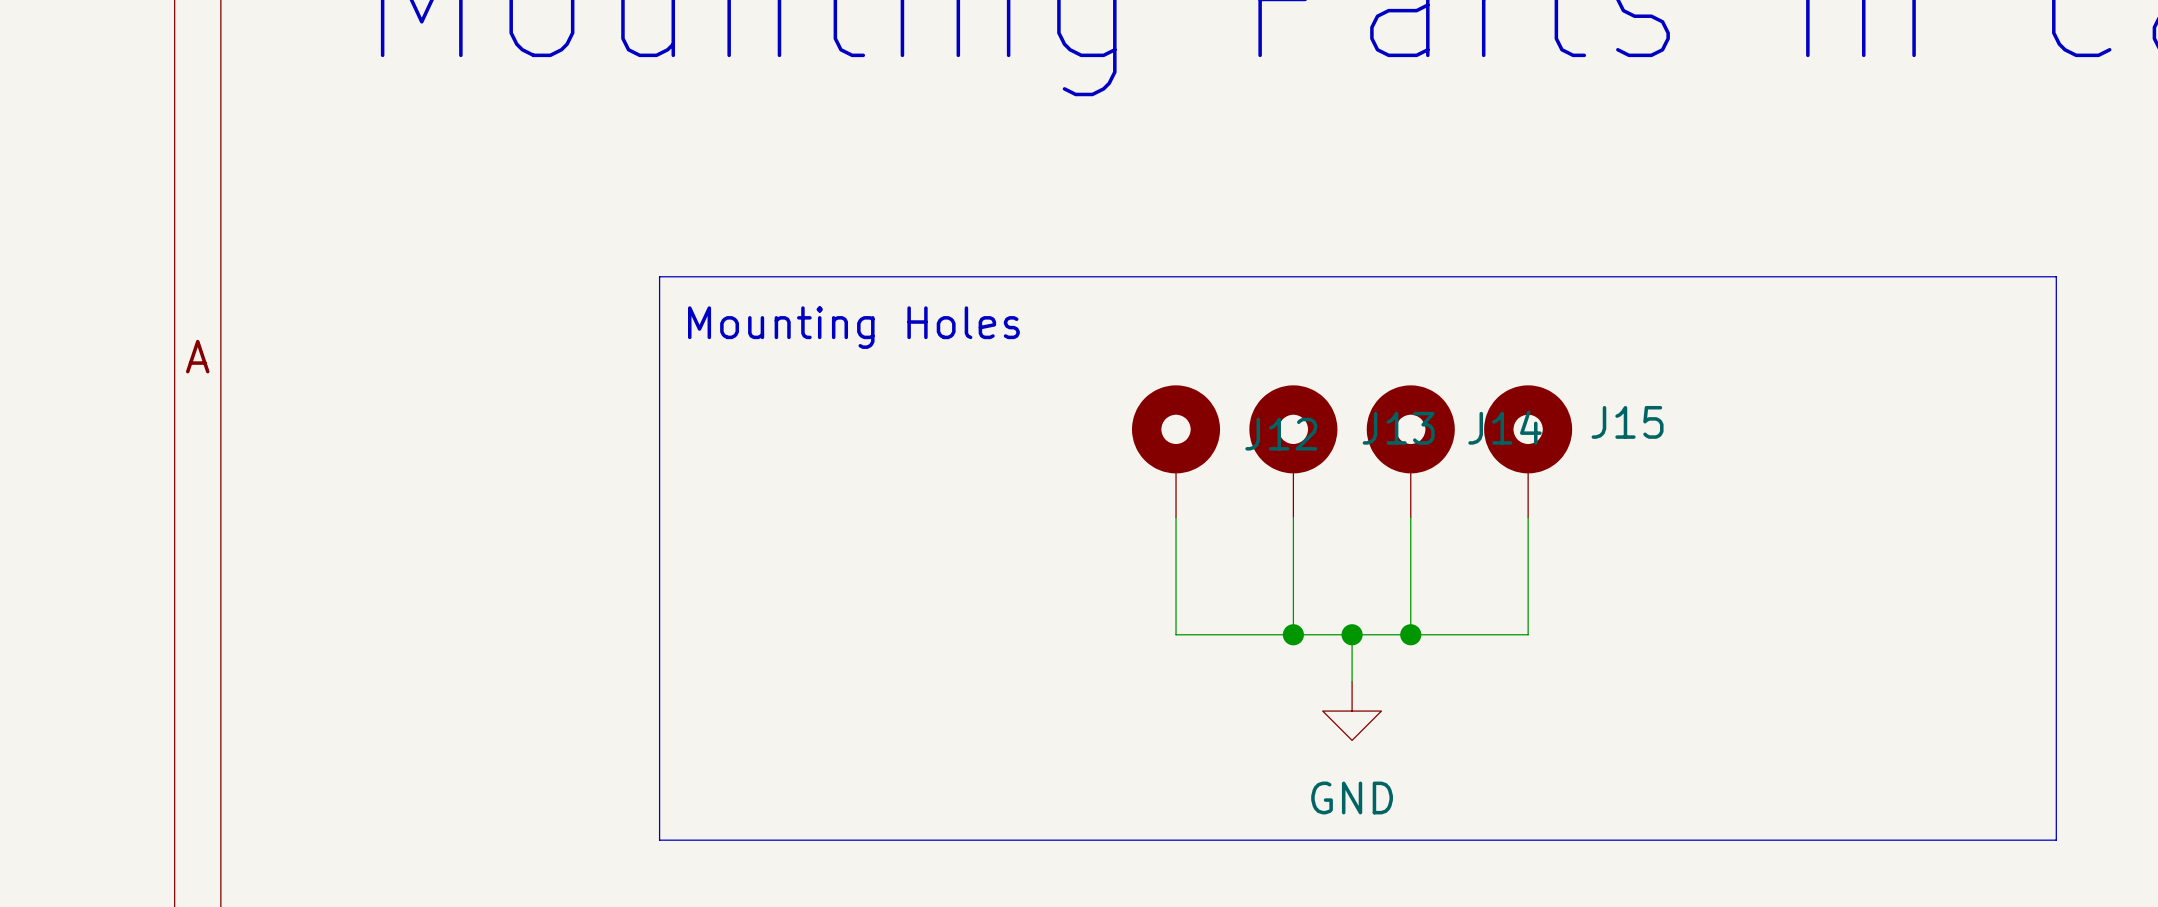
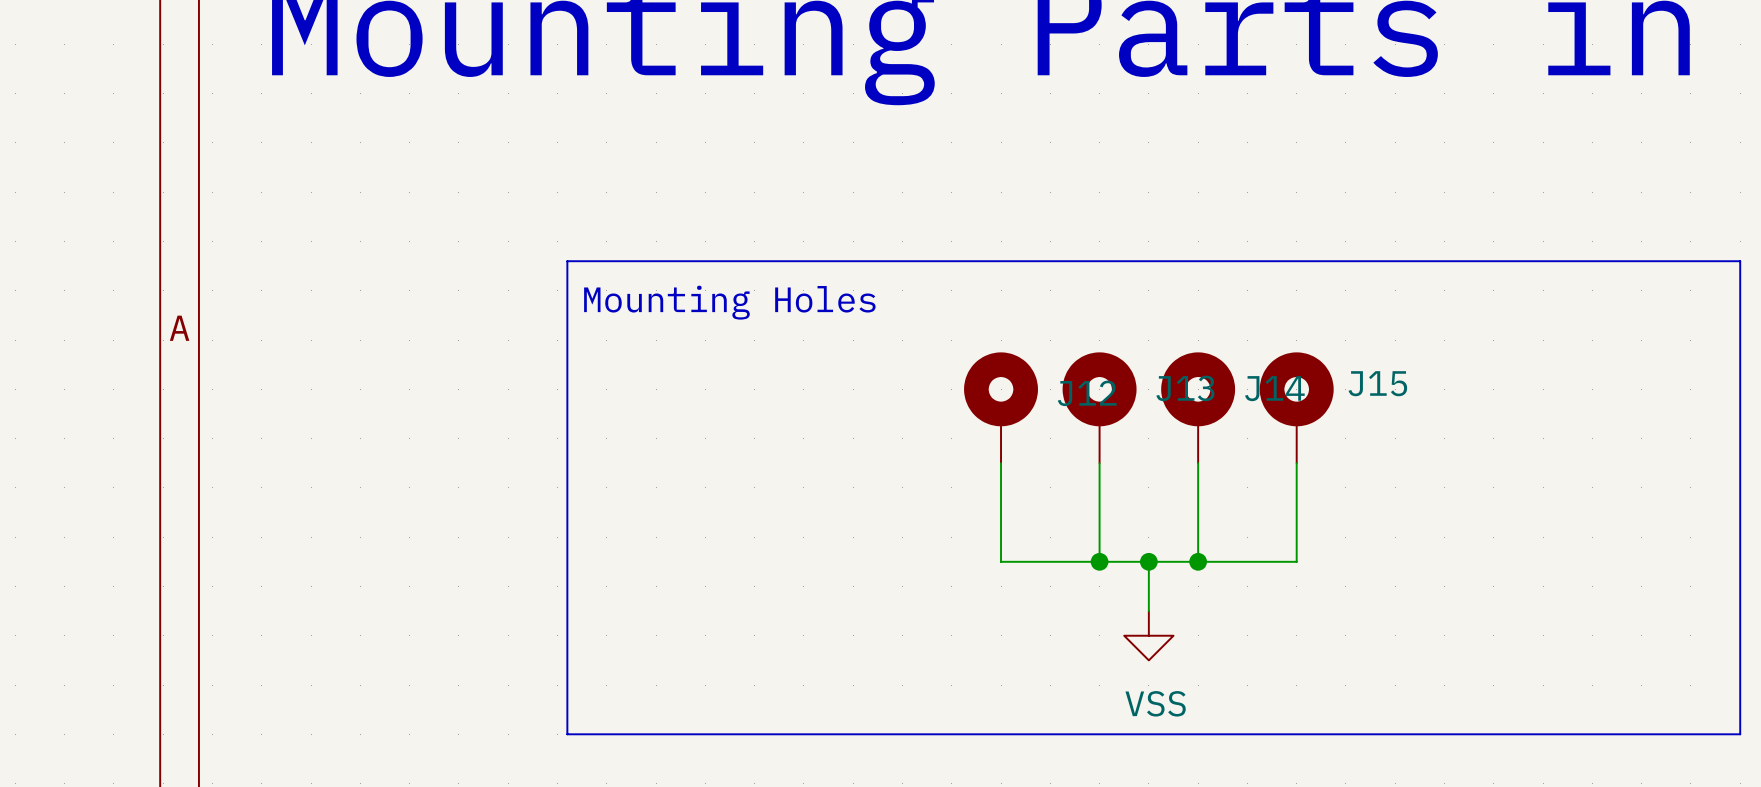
power symbol: GND (1352, 711) -> VSS (1148, 635)

